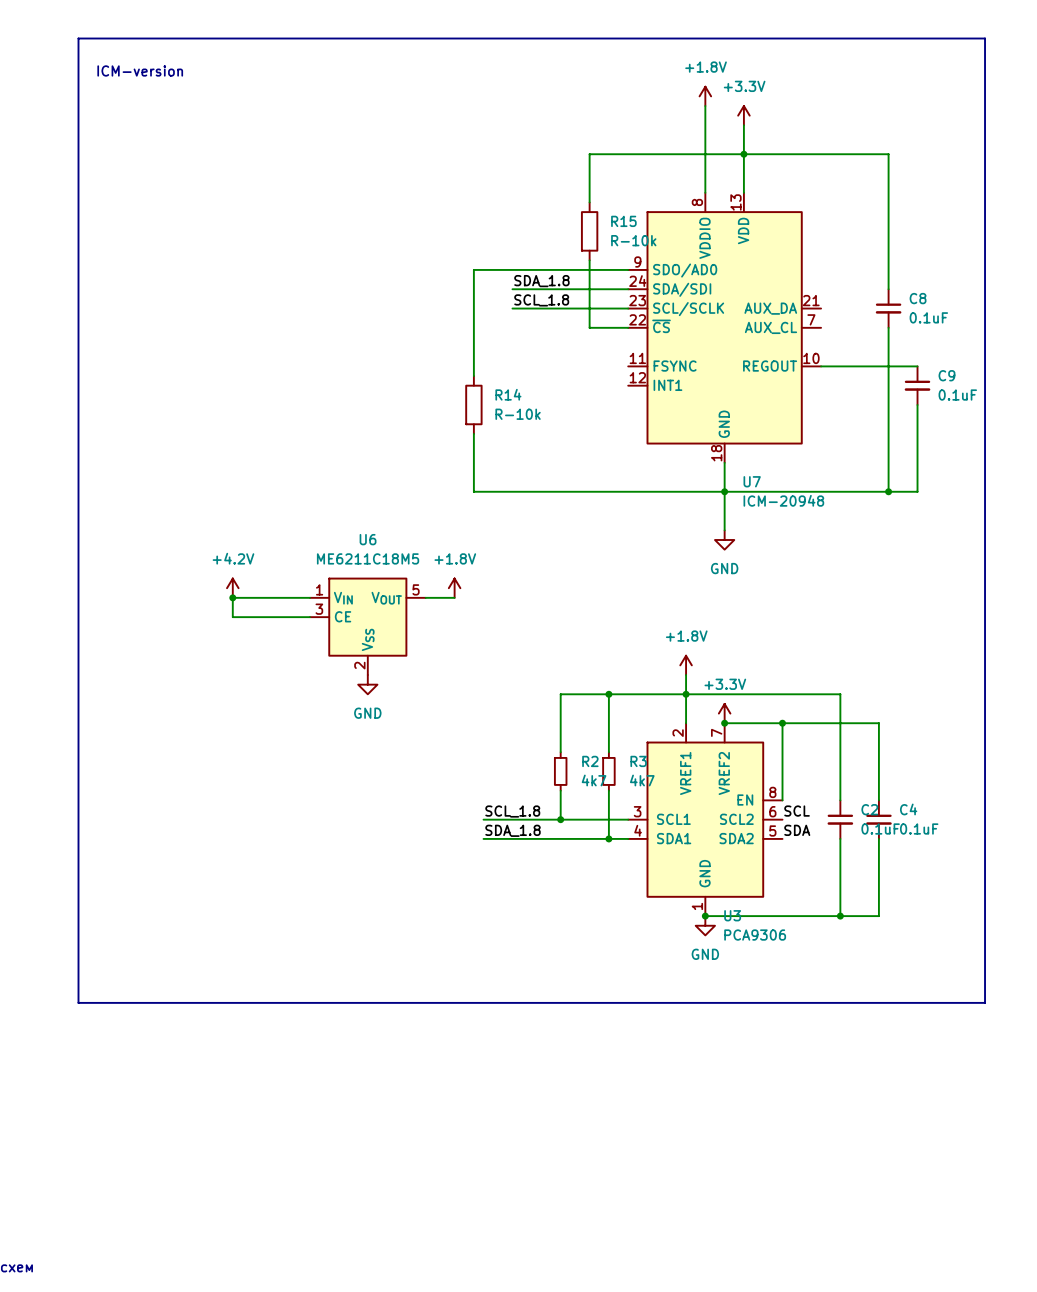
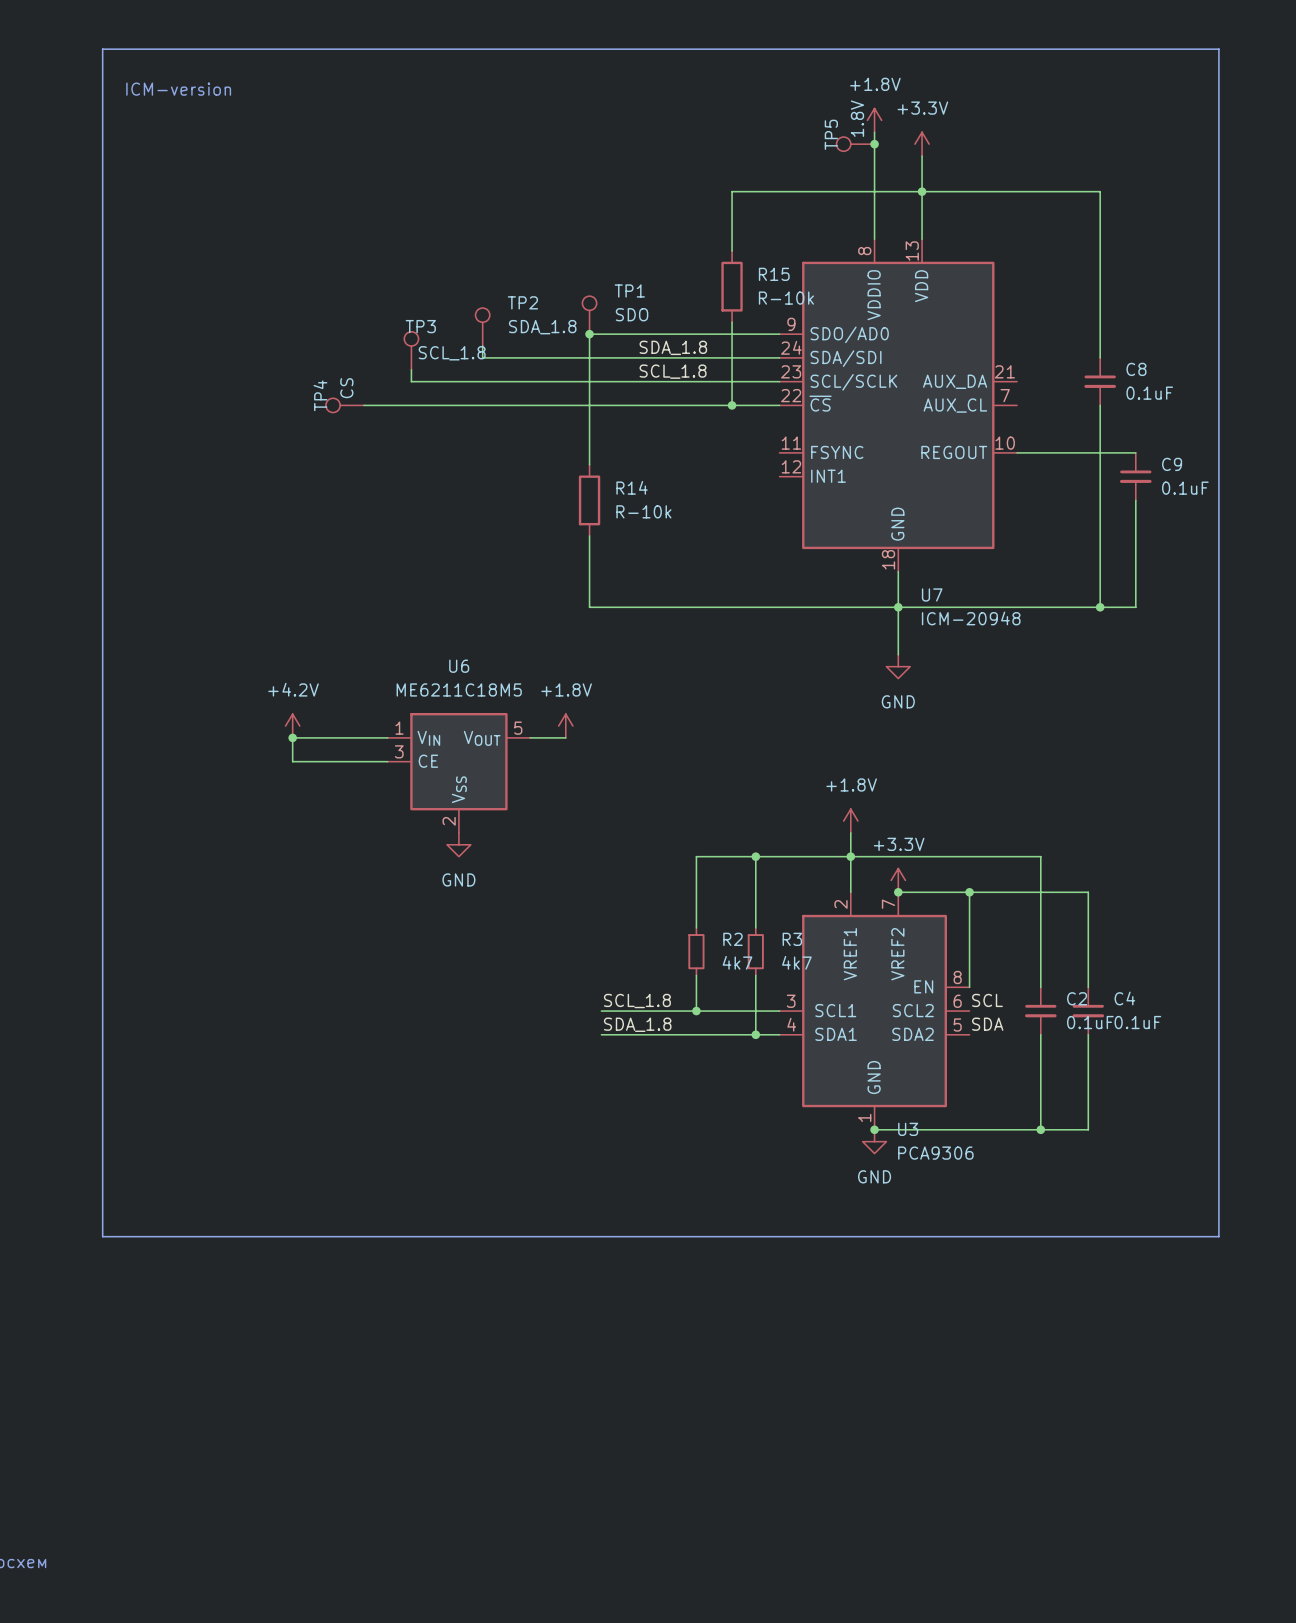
TP5: none -> 1.8V (855, 144)
junction: none -> (874, 144)
TP1: none -> SDO (589, 315)
TP2: none -> SDA_1.8 (482, 327)
junction: none -> (589, 334)
wire: none -> (482, 346) (482, 357) (637, 357)
TP3: none -> SCL_1.8 (411, 350)
wire: none -> (411, 369) (411, 381) (637, 381)
TP4: none -> CS (344, 405)
wire: none -> (363, 405) (732, 405)
junction: none -> (732, 405)

